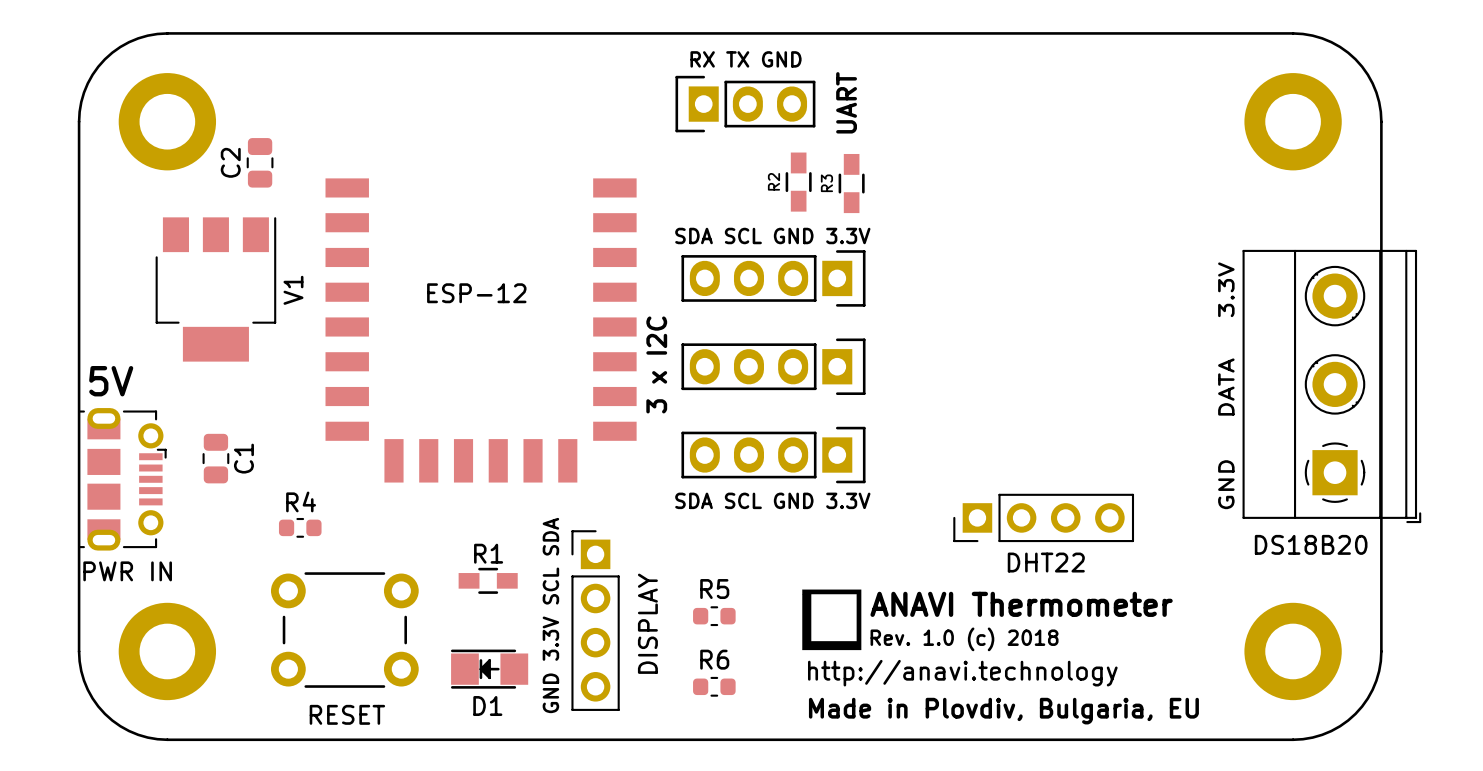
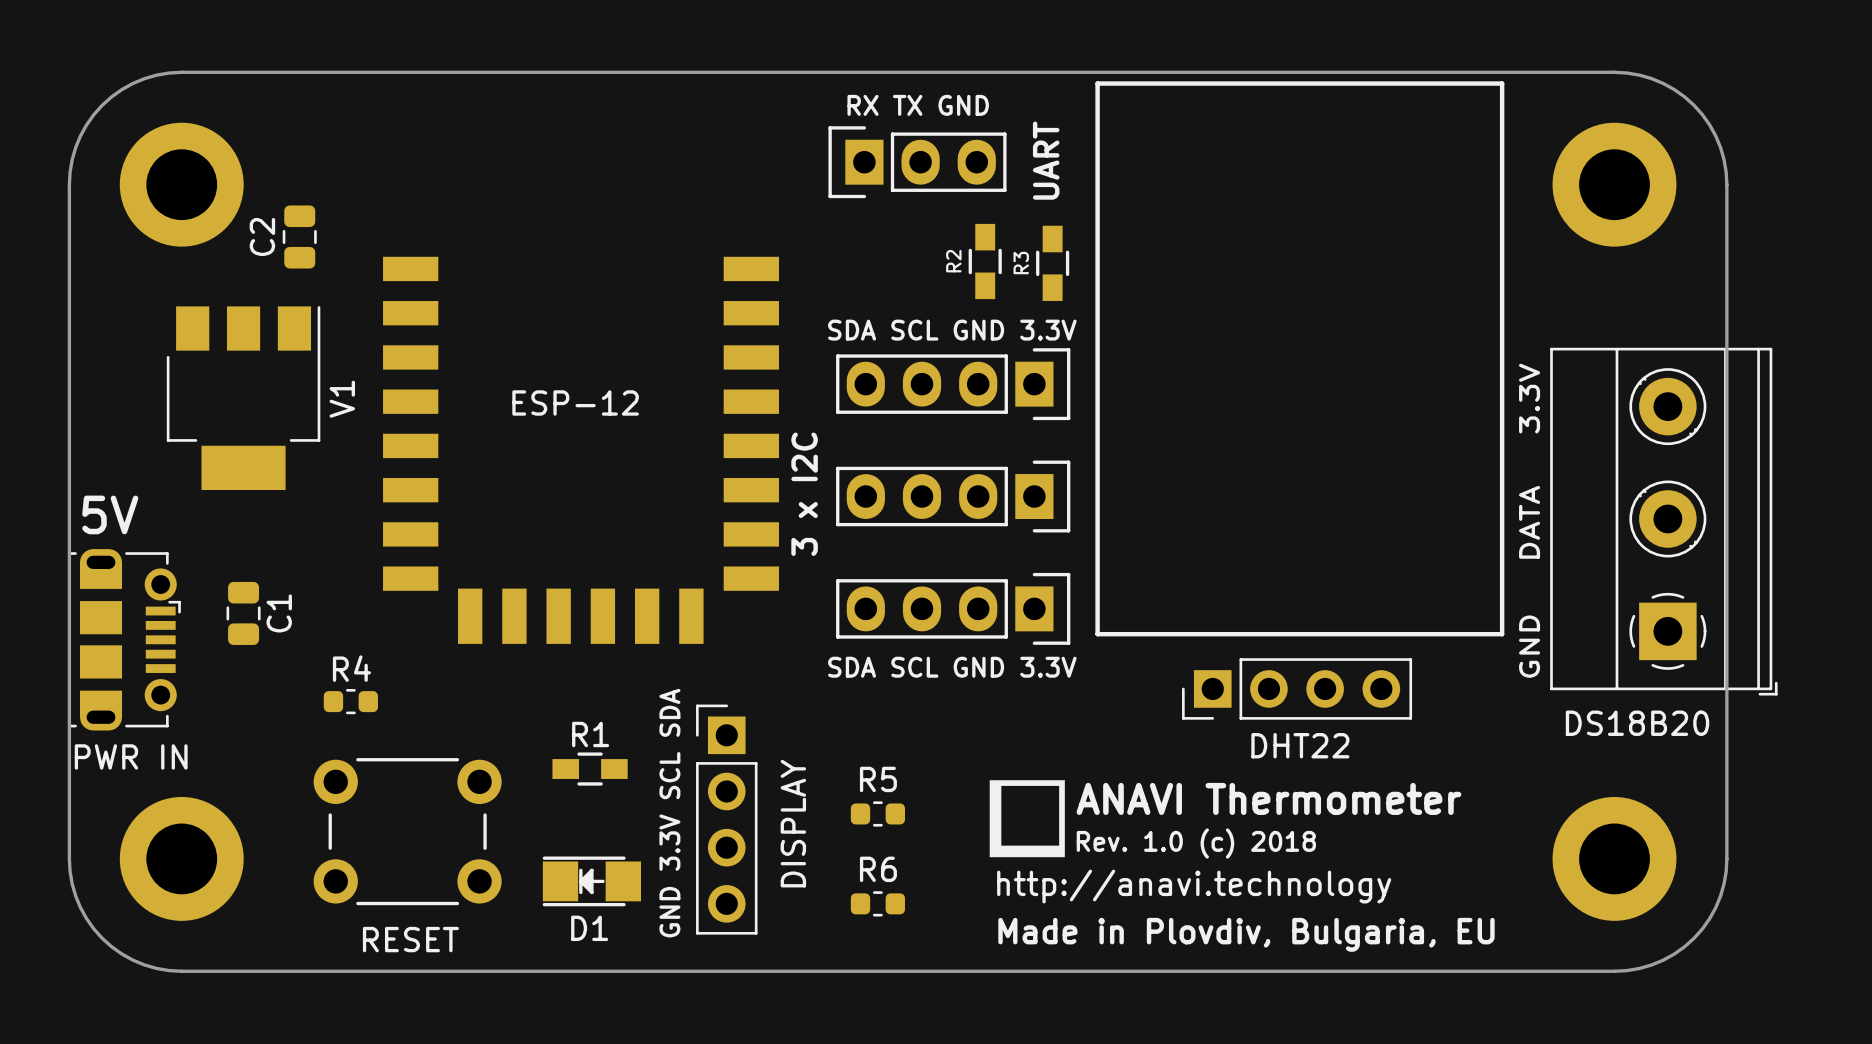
line: none -> (1097, 83) (1097, 634) (1502, 634) (1502, 83) (1097, 83)

